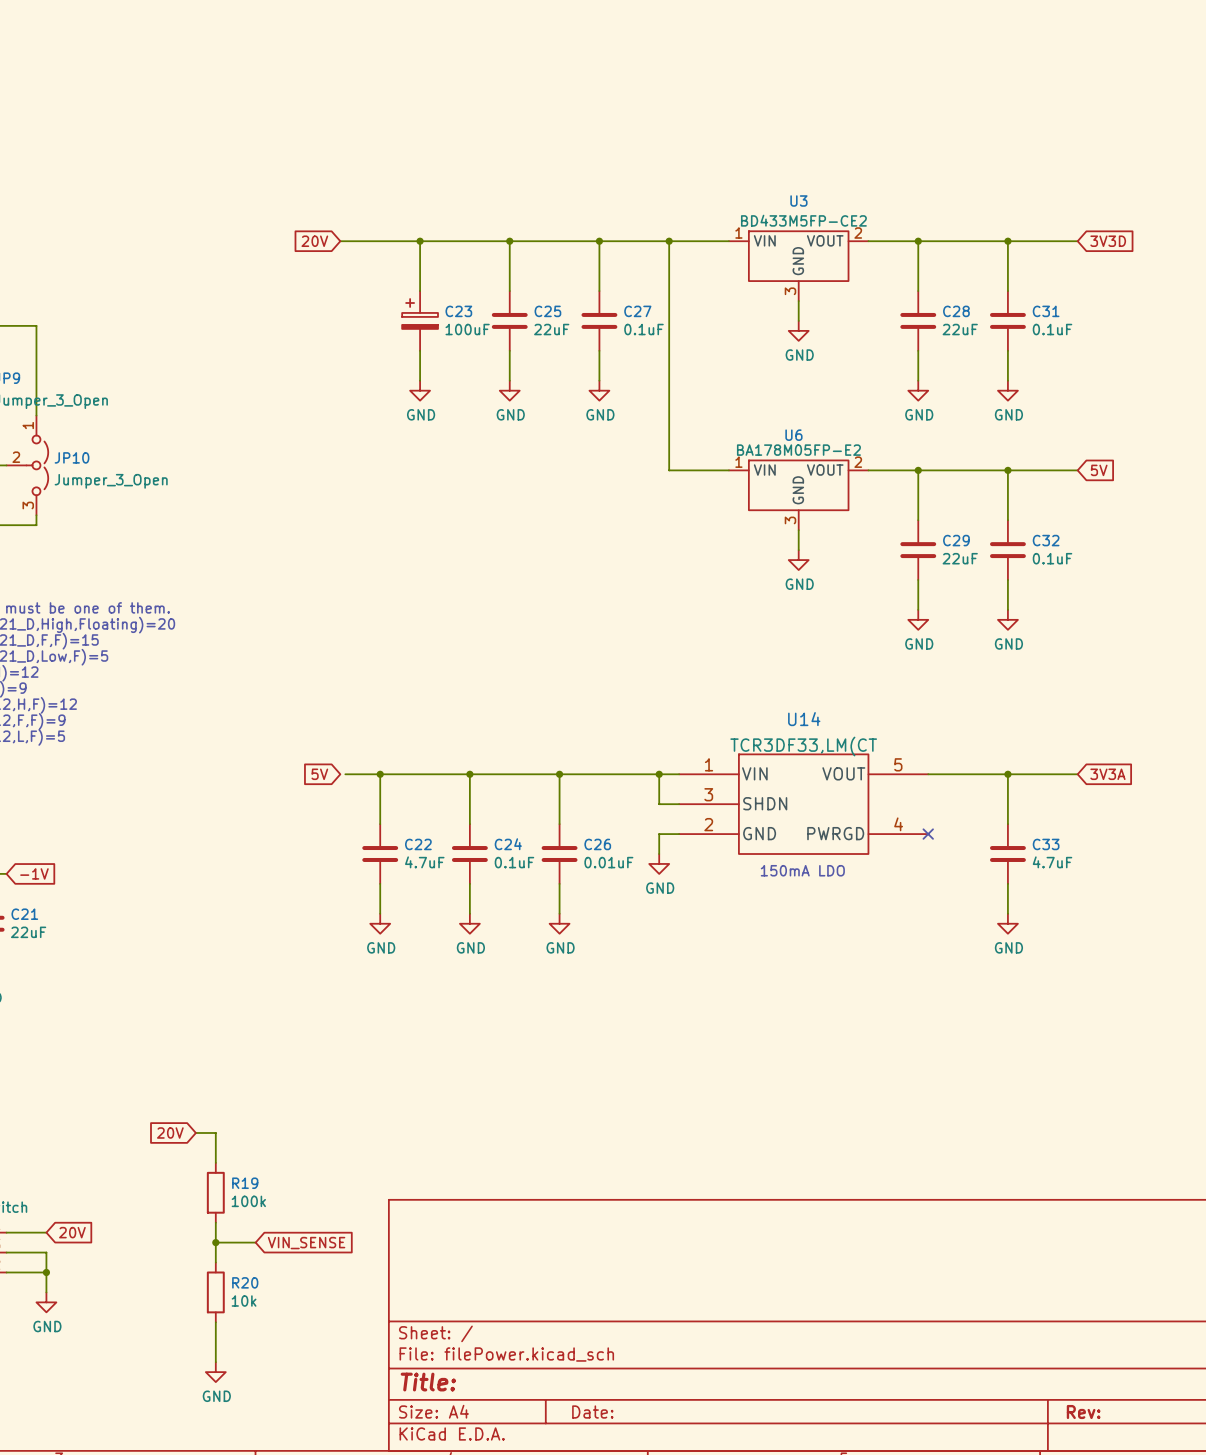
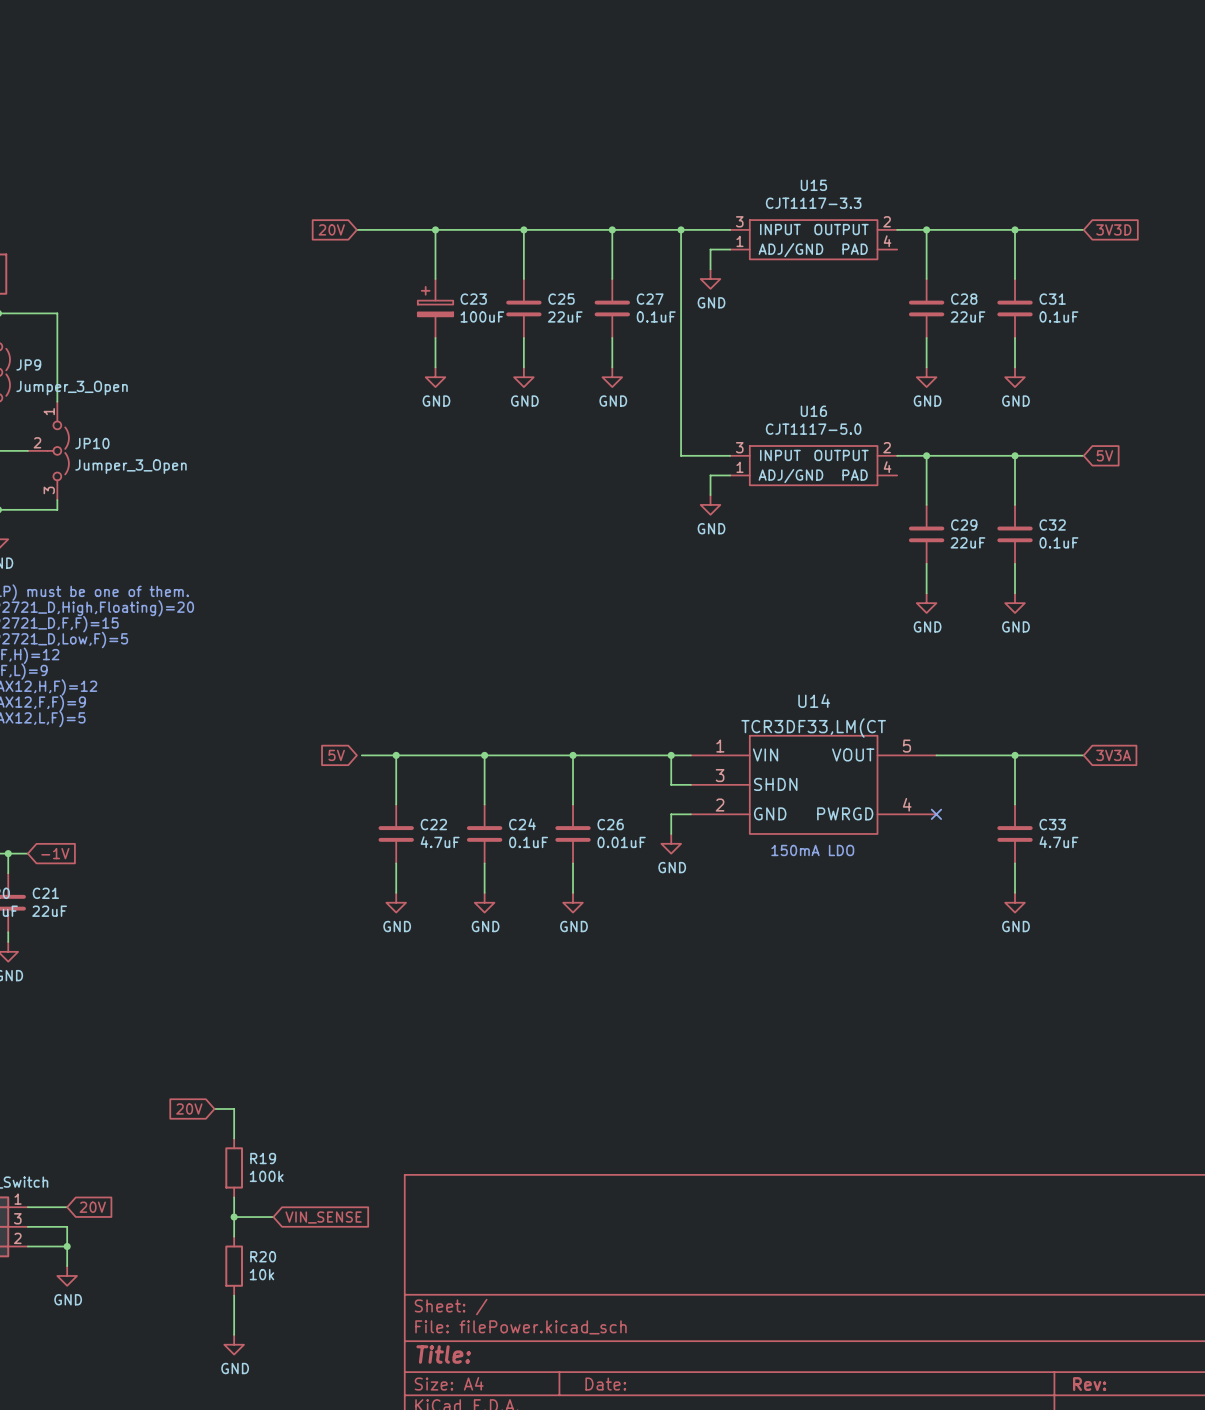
U3: BD433M5FP-CE2 (893, 176) -> none
U15: none -> CJT1117-3.3 (813, 239)
wire: none -> (730, 249) (710, 249) (710, 269)
power symbol: none -> GND (710, 279)
wire: (798, 301) (798, 320) -> none
power symbol: GND (798, 330) -> none
U6: BA178M05FP-E2 (893, 405) -> none
U16: none -> CJT1117-5.0 (813, 465)
wire: none -> (730, 475) (710, 475) (710, 495)
power symbol: none -> GND (710, 504)
wire: (798, 530) (798, 550) -> none
power symbol: GND (798, 560) -> none

